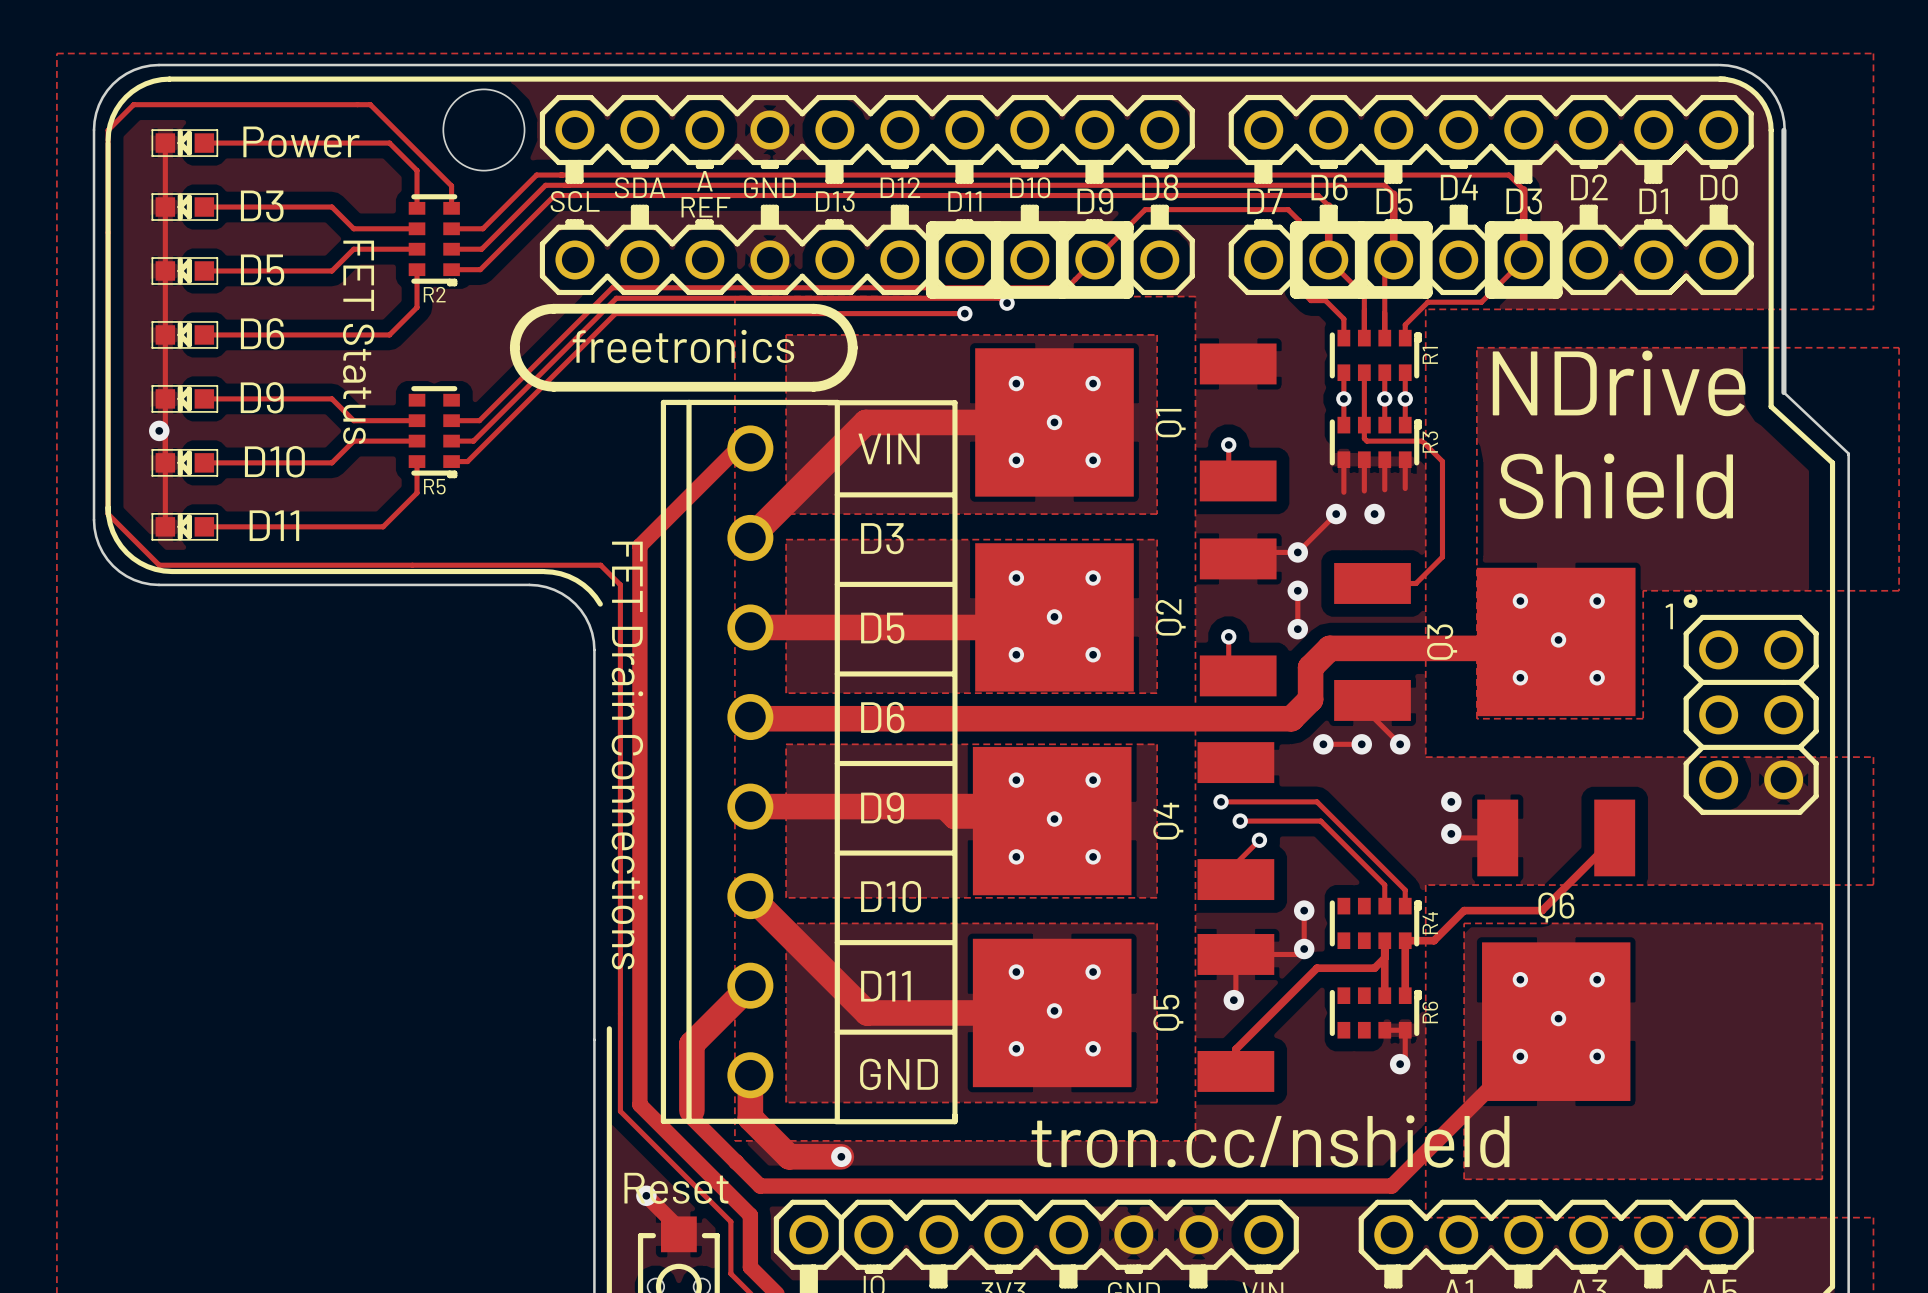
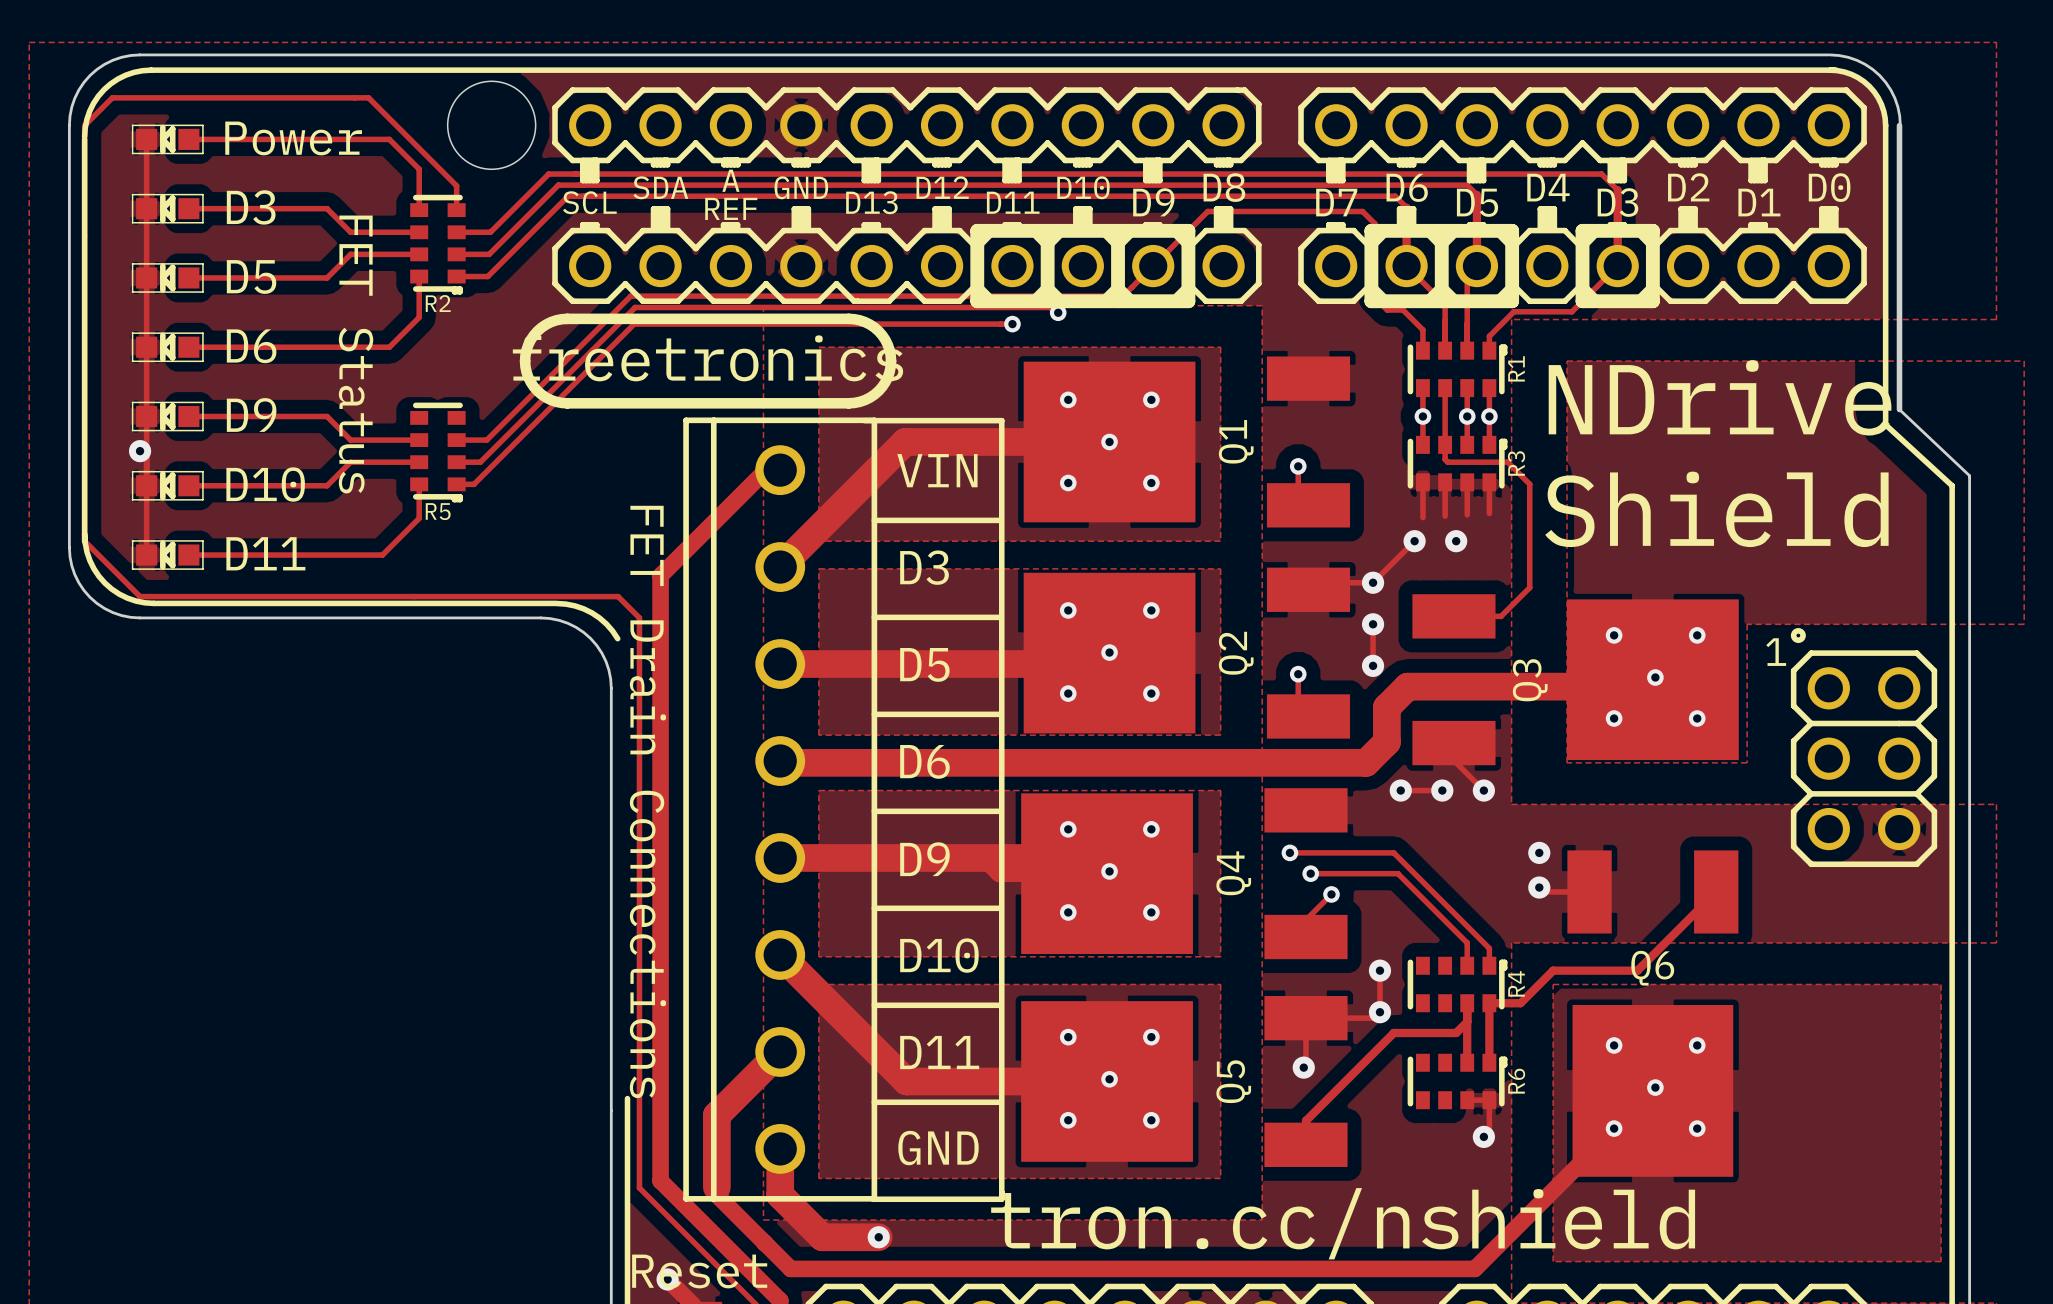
drawing shape: [509, 303, 858, 392] -> [512, 313, 904, 409]

